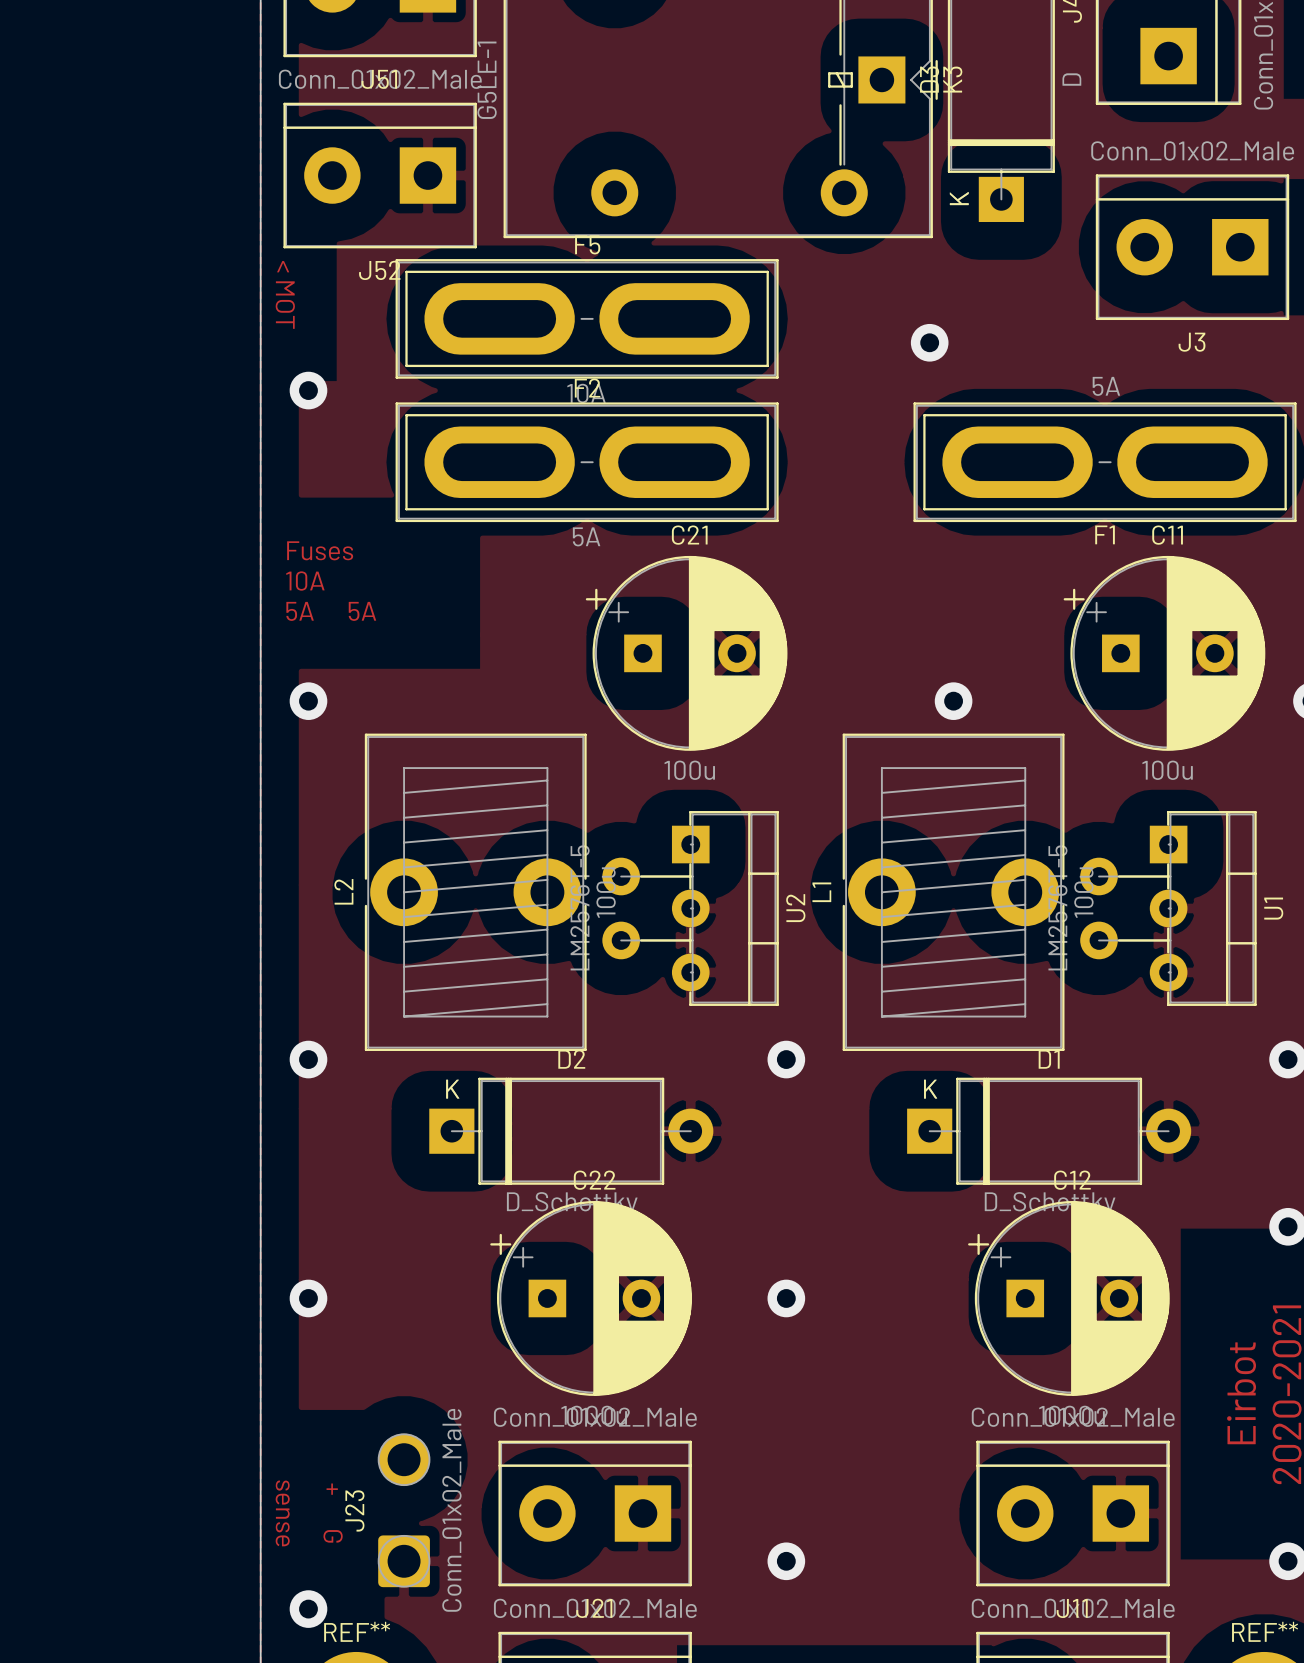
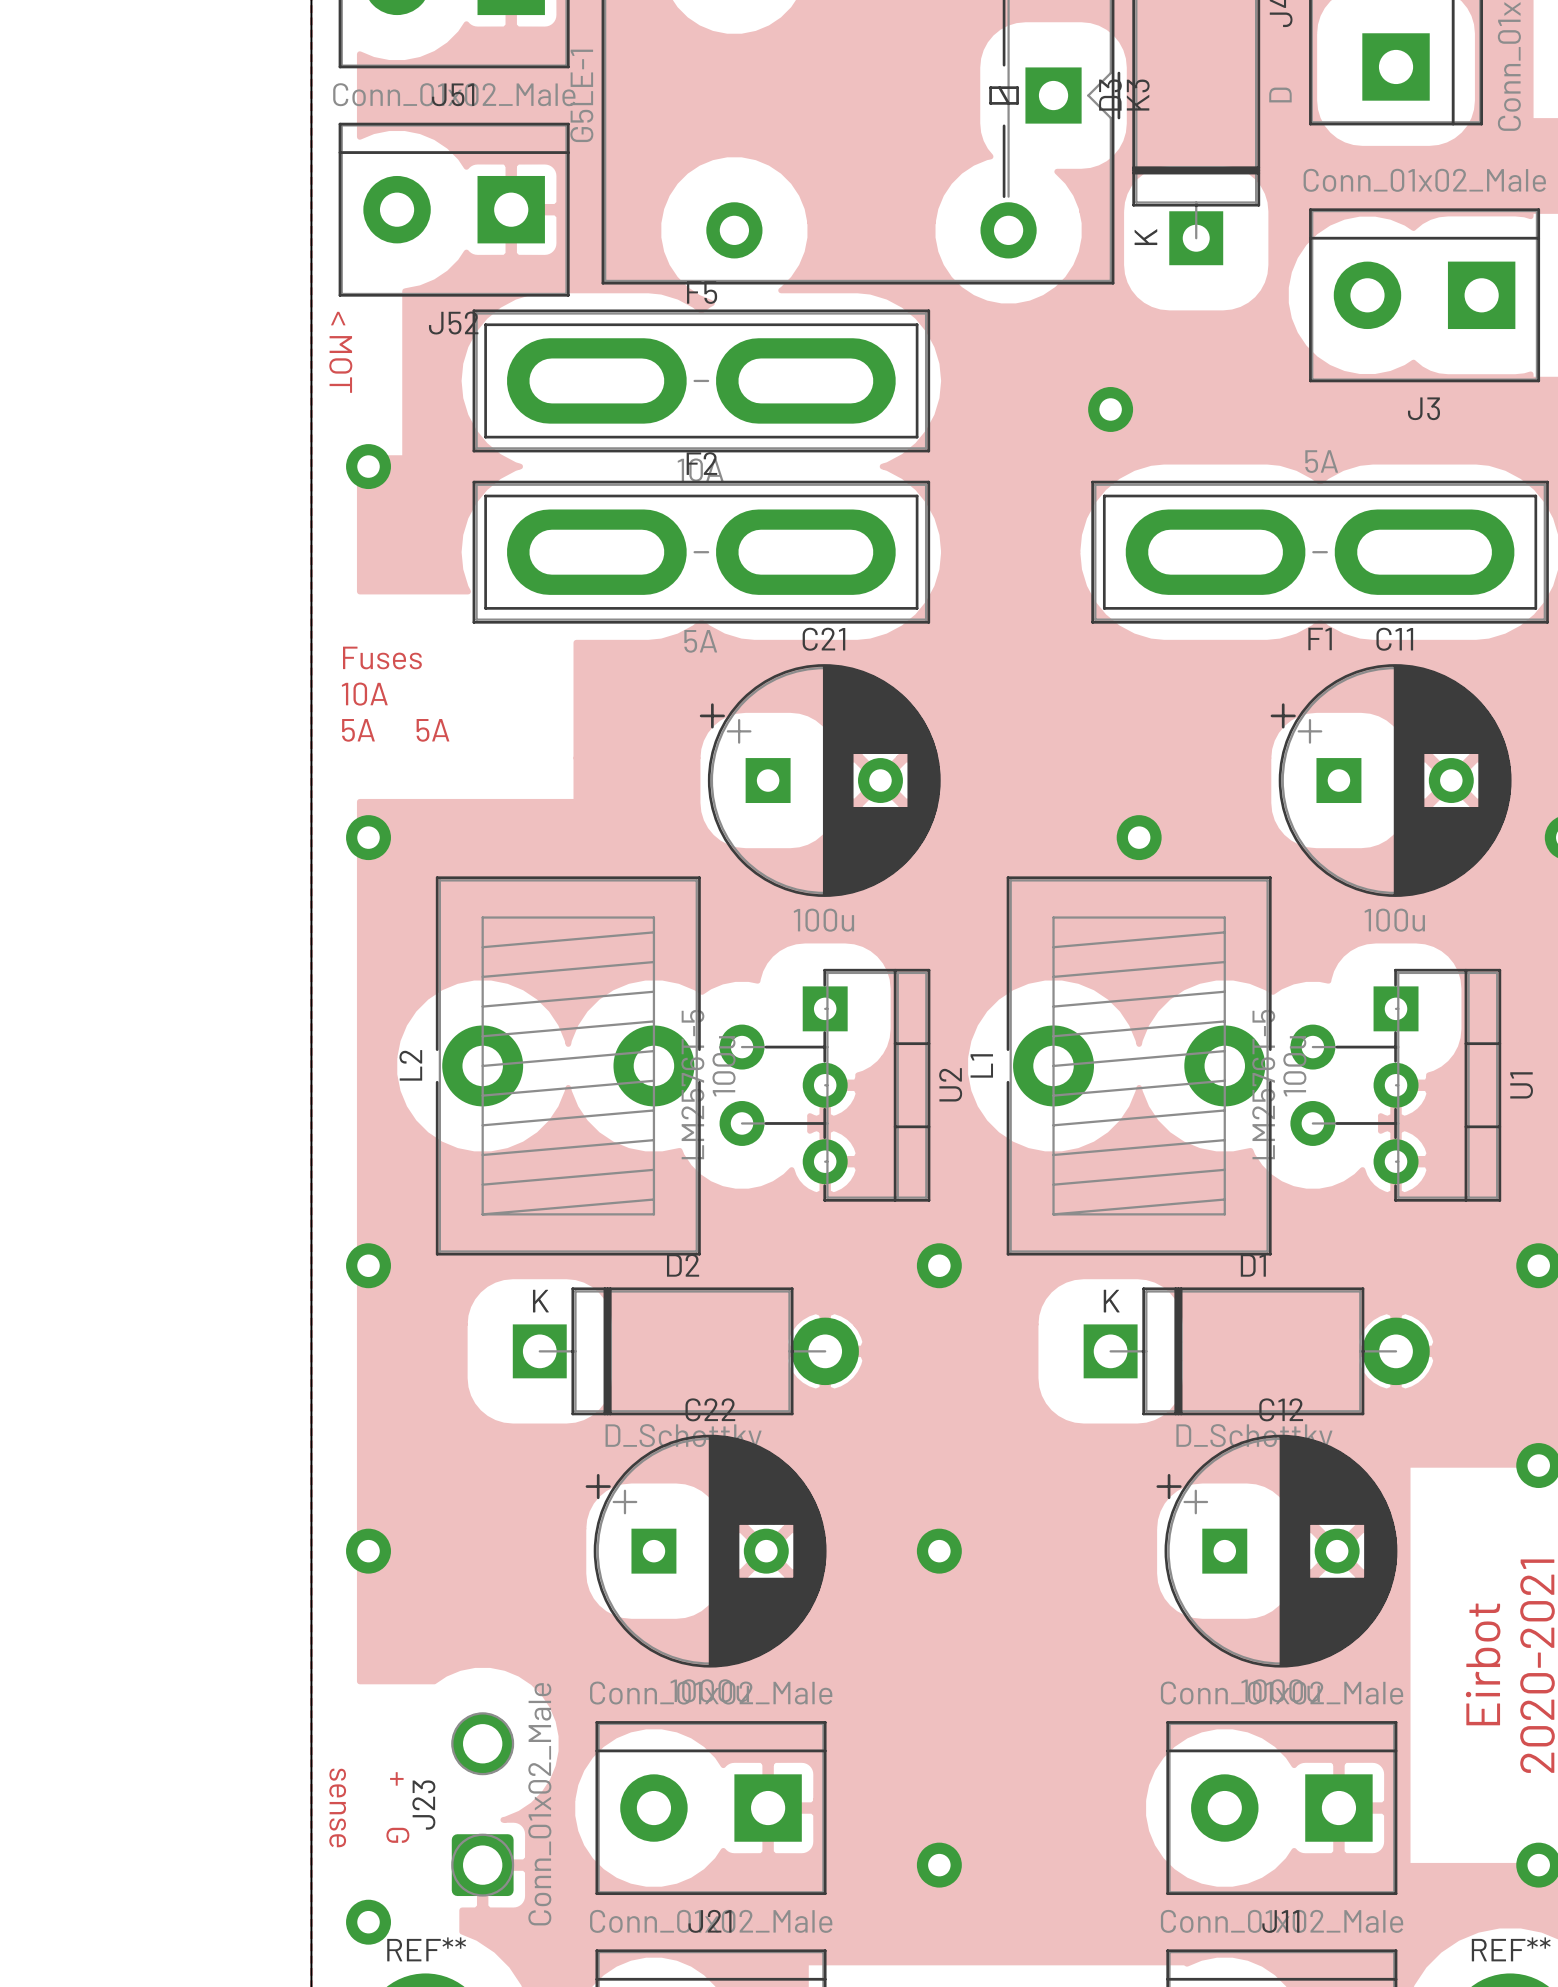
D2 footprint: [429, 1077, 714, 1185] -> [512, 1287, 859, 1416]
D1 footprint: [907, 1077, 1192, 1185] -> [1083, 1287, 1430, 1416]

